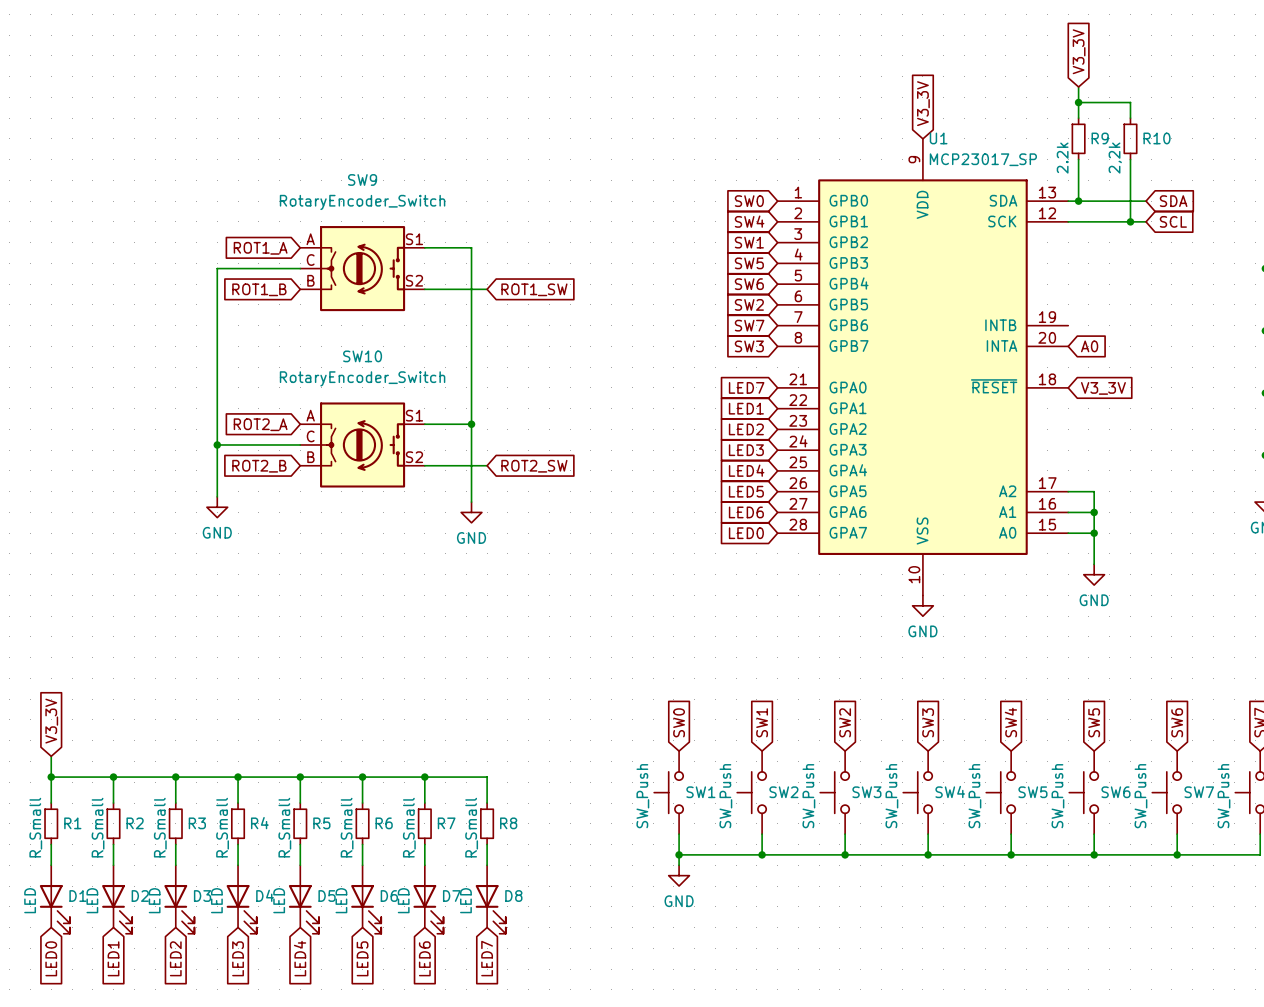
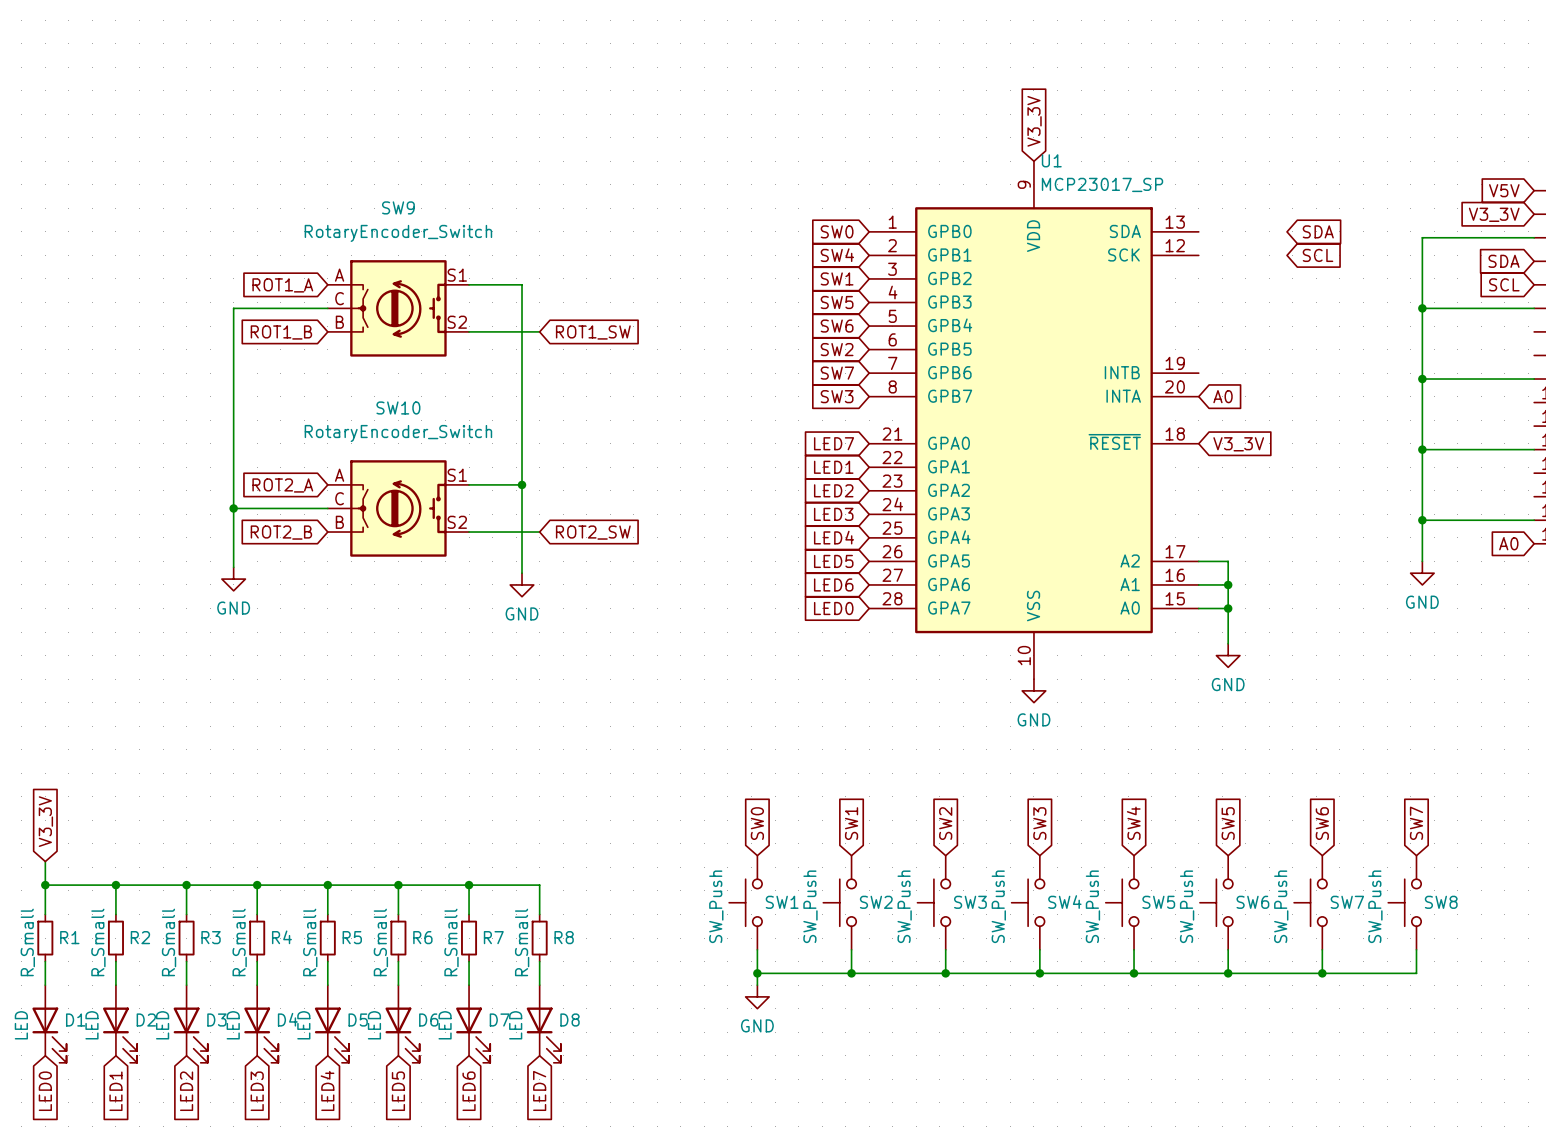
global label: V3_3V (1079, 51) -> none
wire: (1078, 86) (1078, 118) -> none
wire: (1078, 102) (1130, 102) (1130, 118) -> none
junction: (1078, 102) -> none
R9: 2.2k (1078, 138) -> none
R10: 2,2k (1130, 138) -> none
wire: (1078, 159) (1078, 201) -> none
wire: (1130, 159) (1130, 221) -> none
wire: (1068, 201) (1146, 201) -> none
junction: (1078, 201) -> none
wire: (1068, 221) (1146, 221) -> none
junction: (1130, 221) -> none

